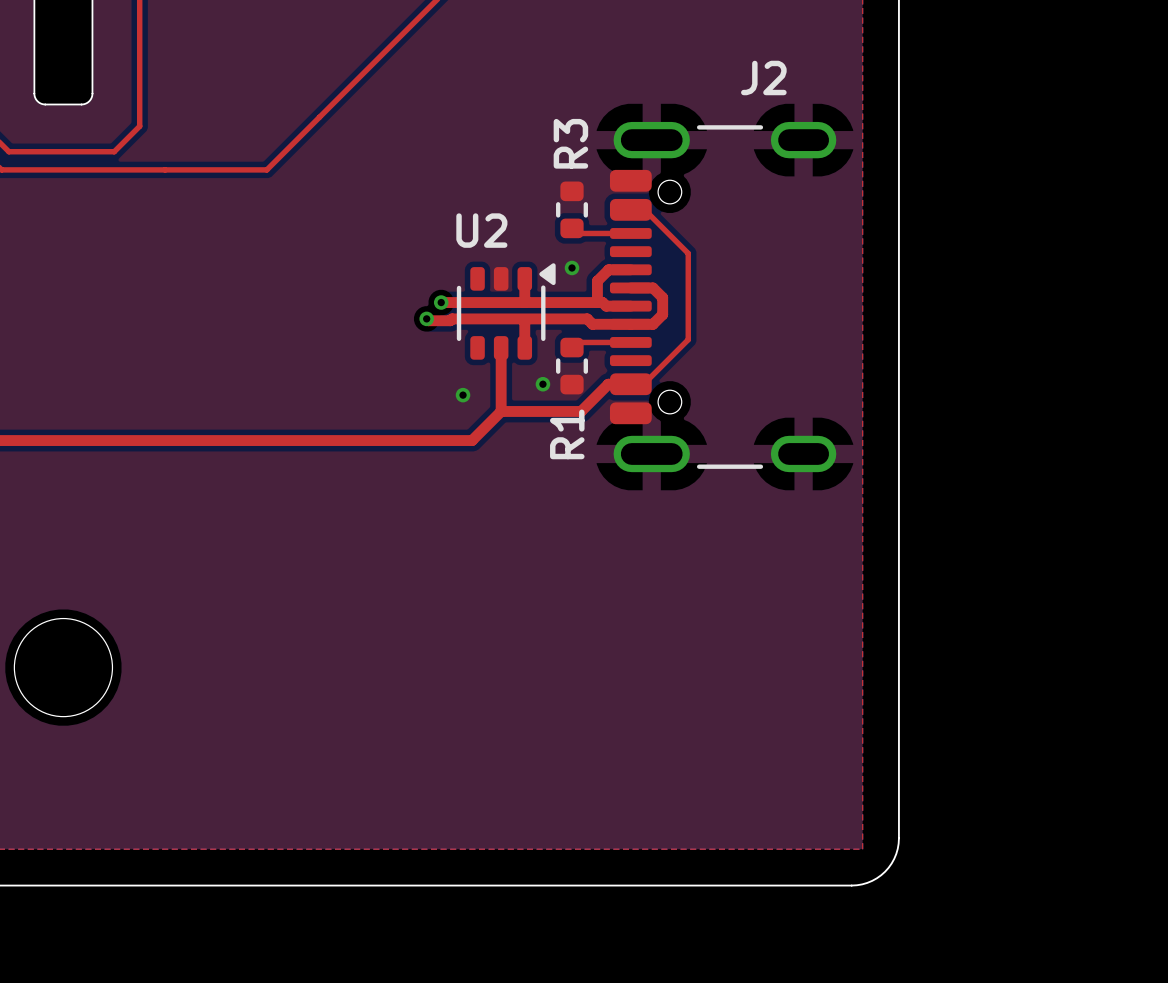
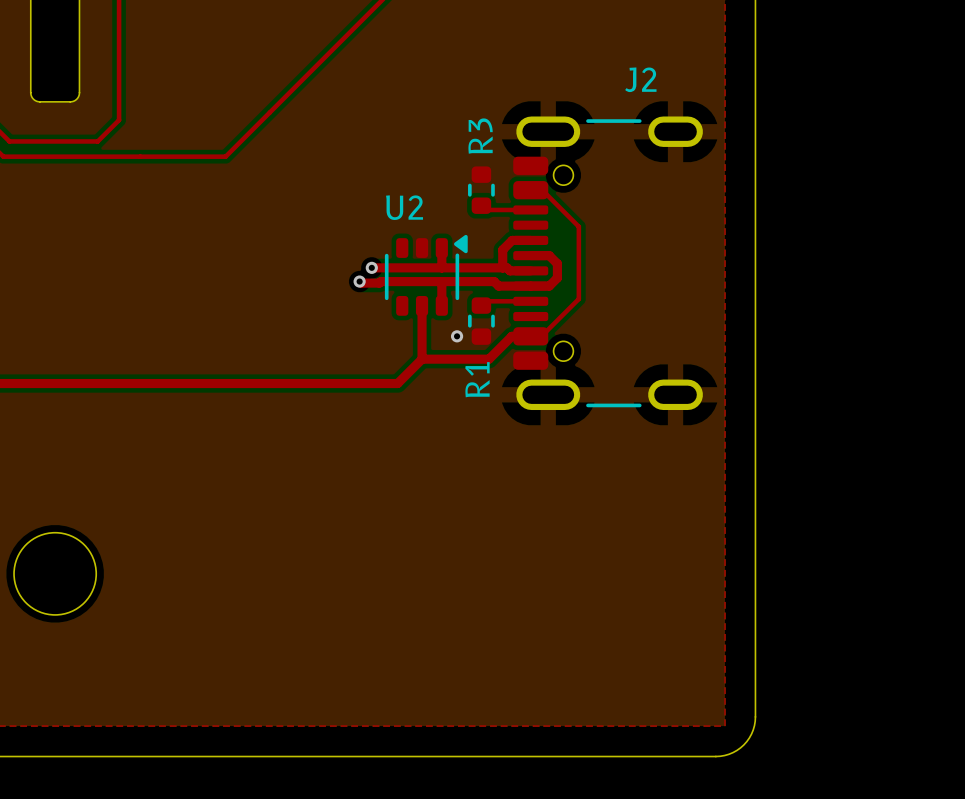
via: (572, 267) -> none
via: (463, 395) -> none

